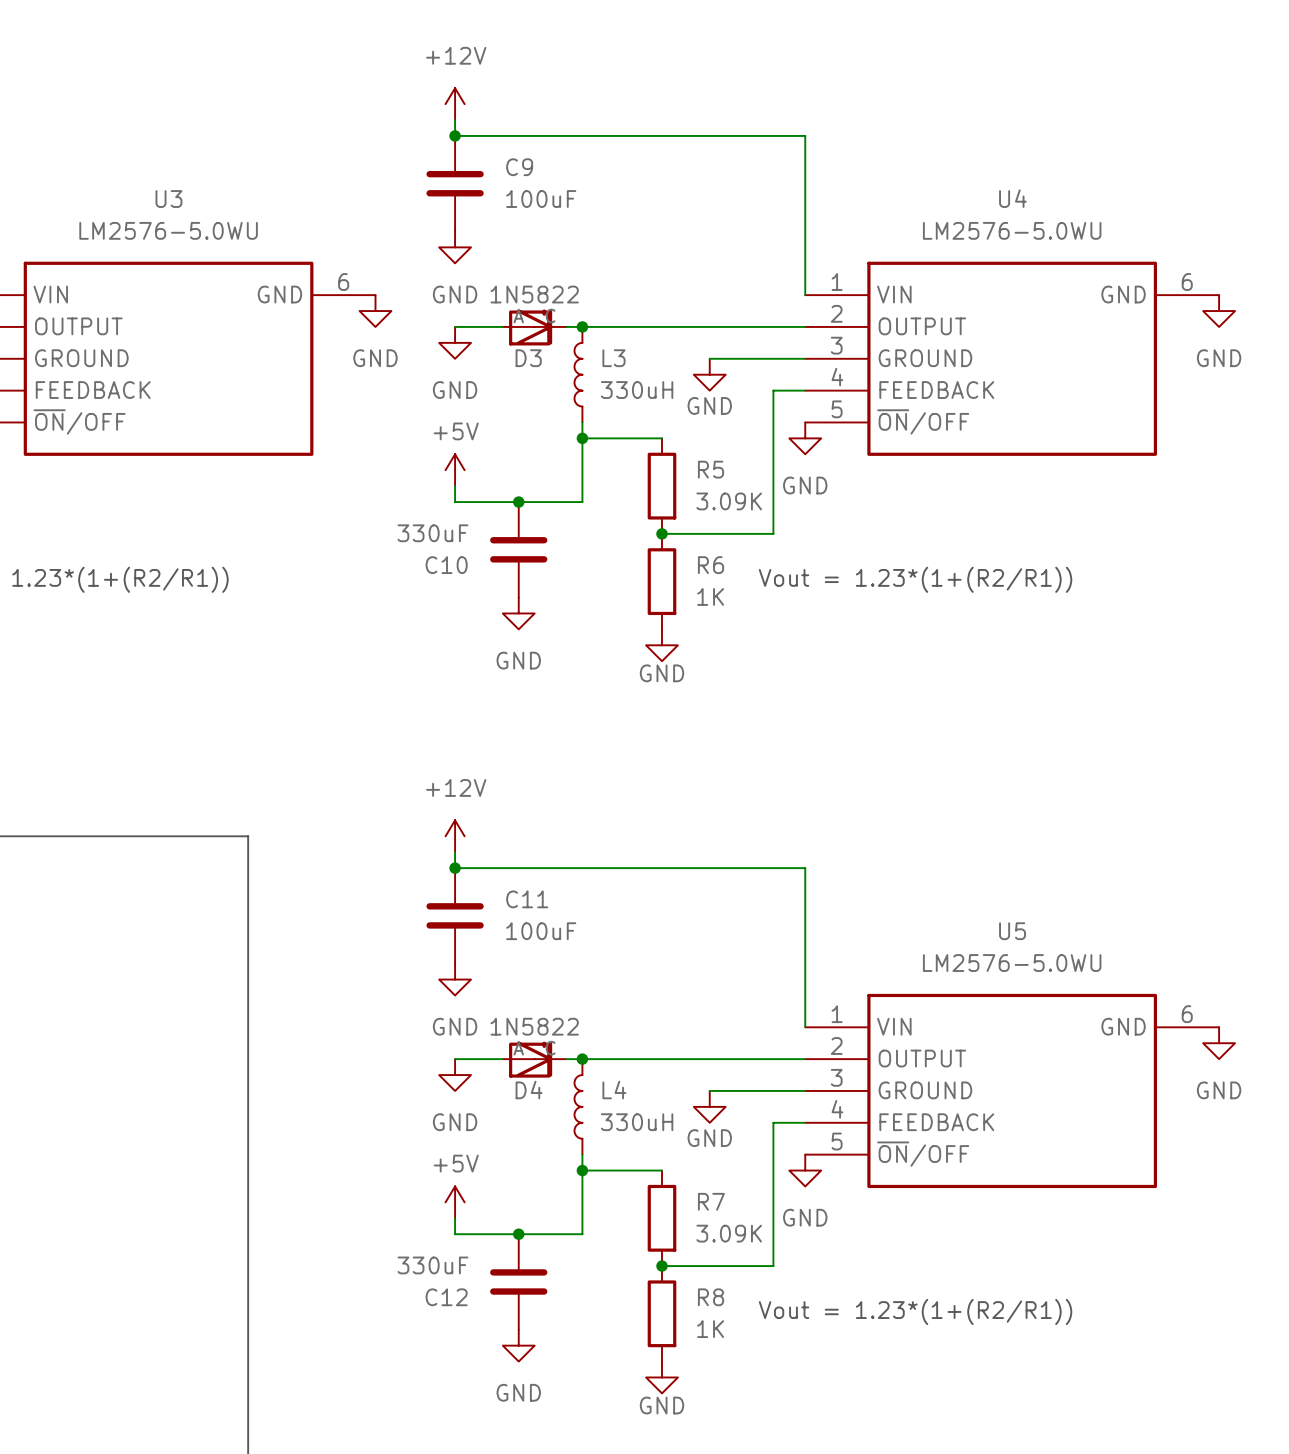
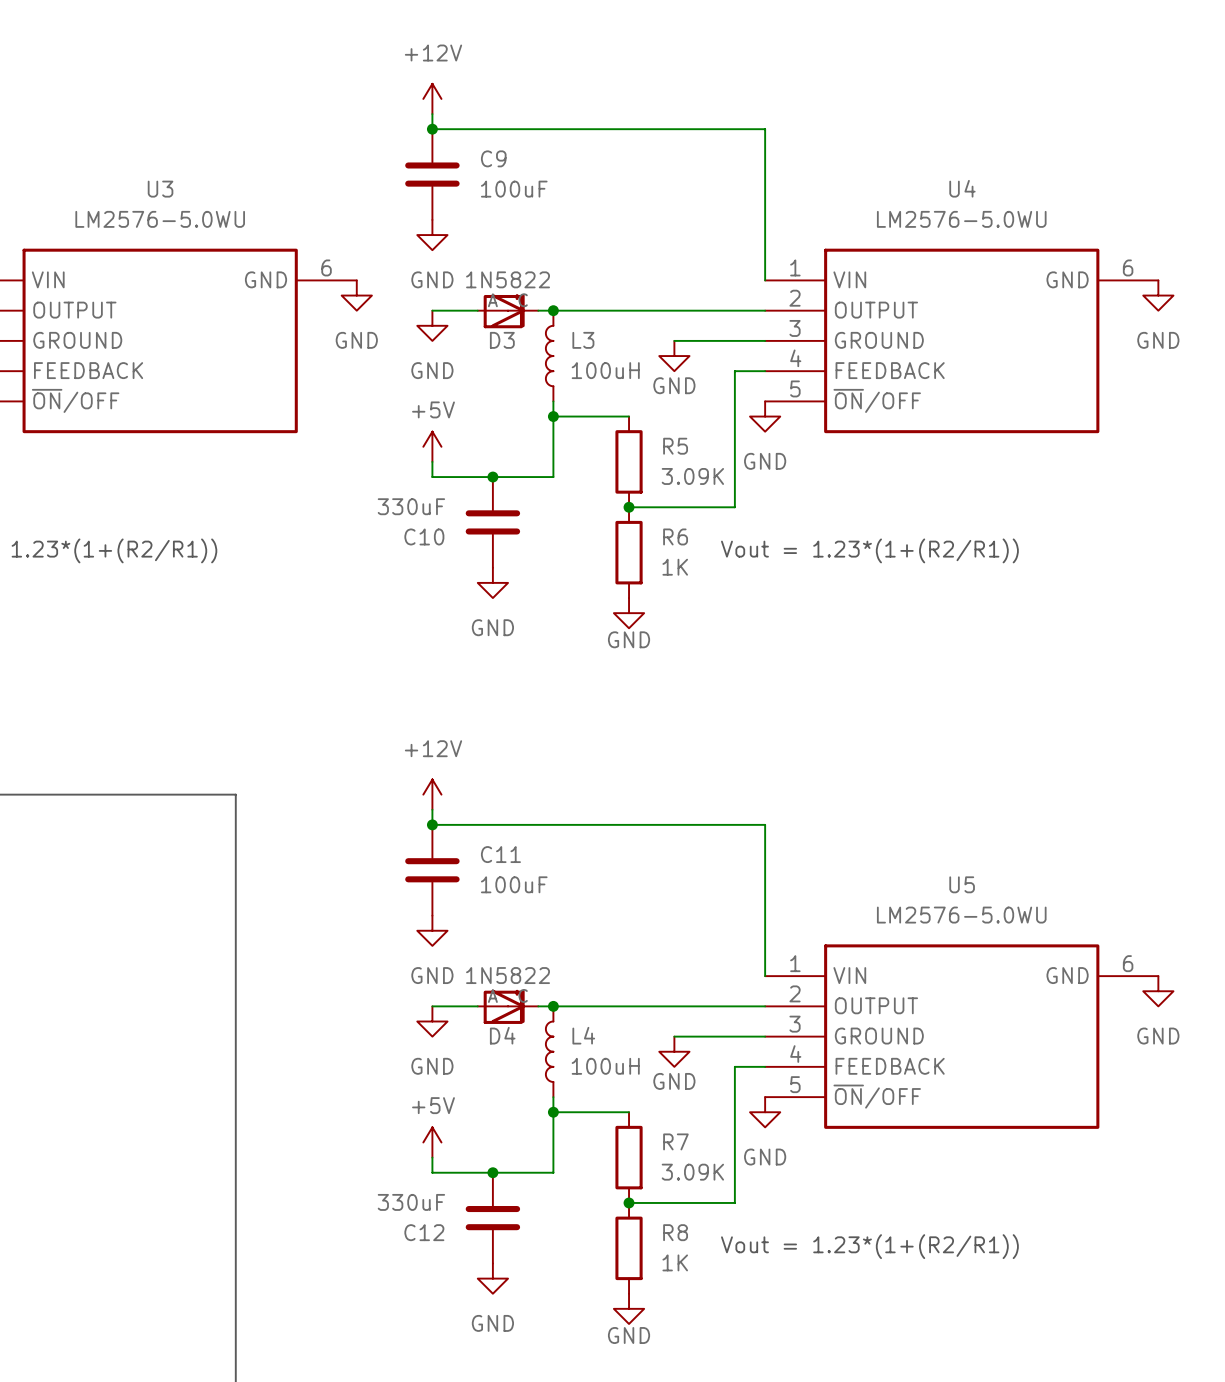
L3 value: 330uH (637, 390) -> 100uH (605, 370)
L4 value: 330uH (637, 1122) -> 100uH (605, 1066)

